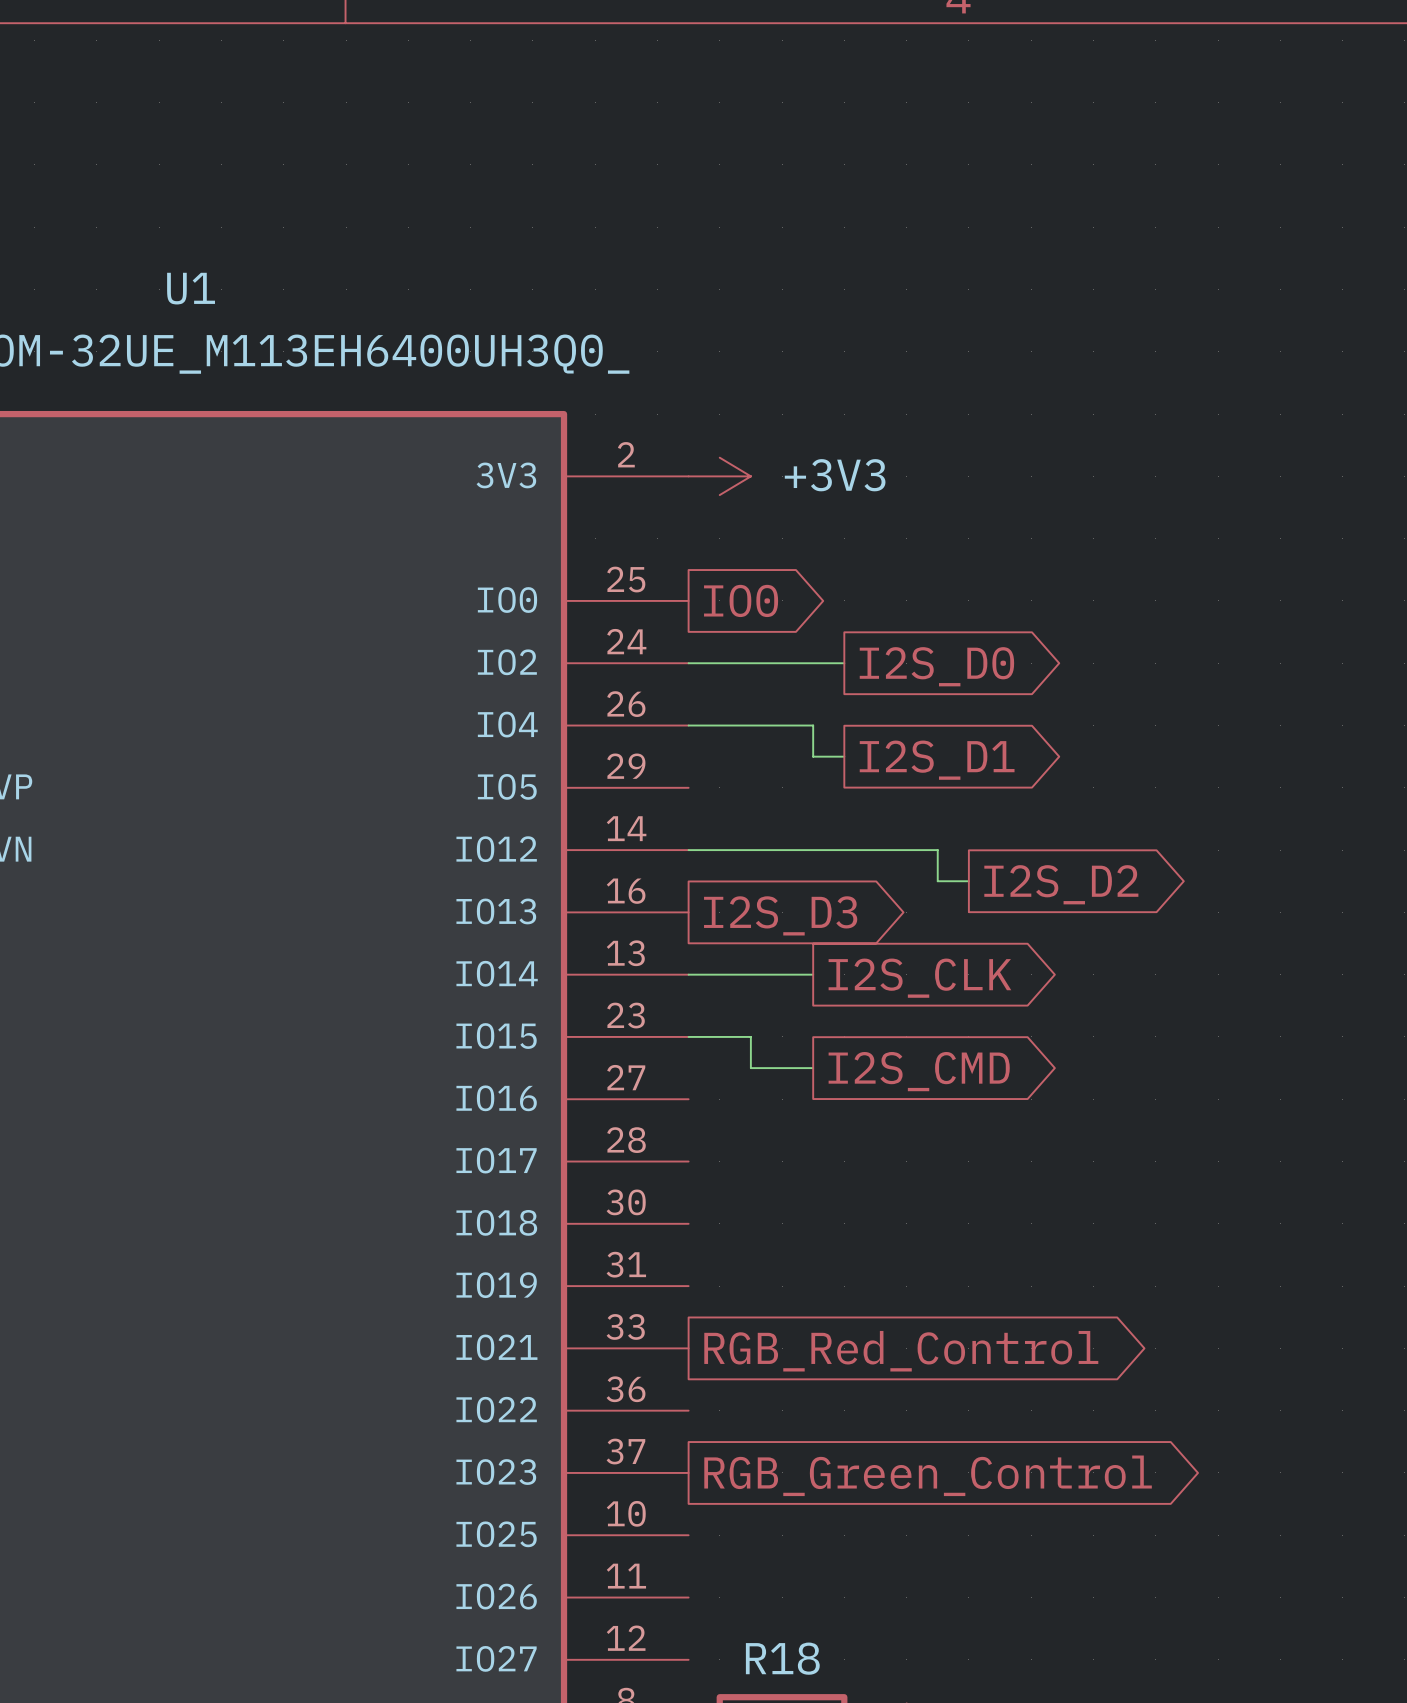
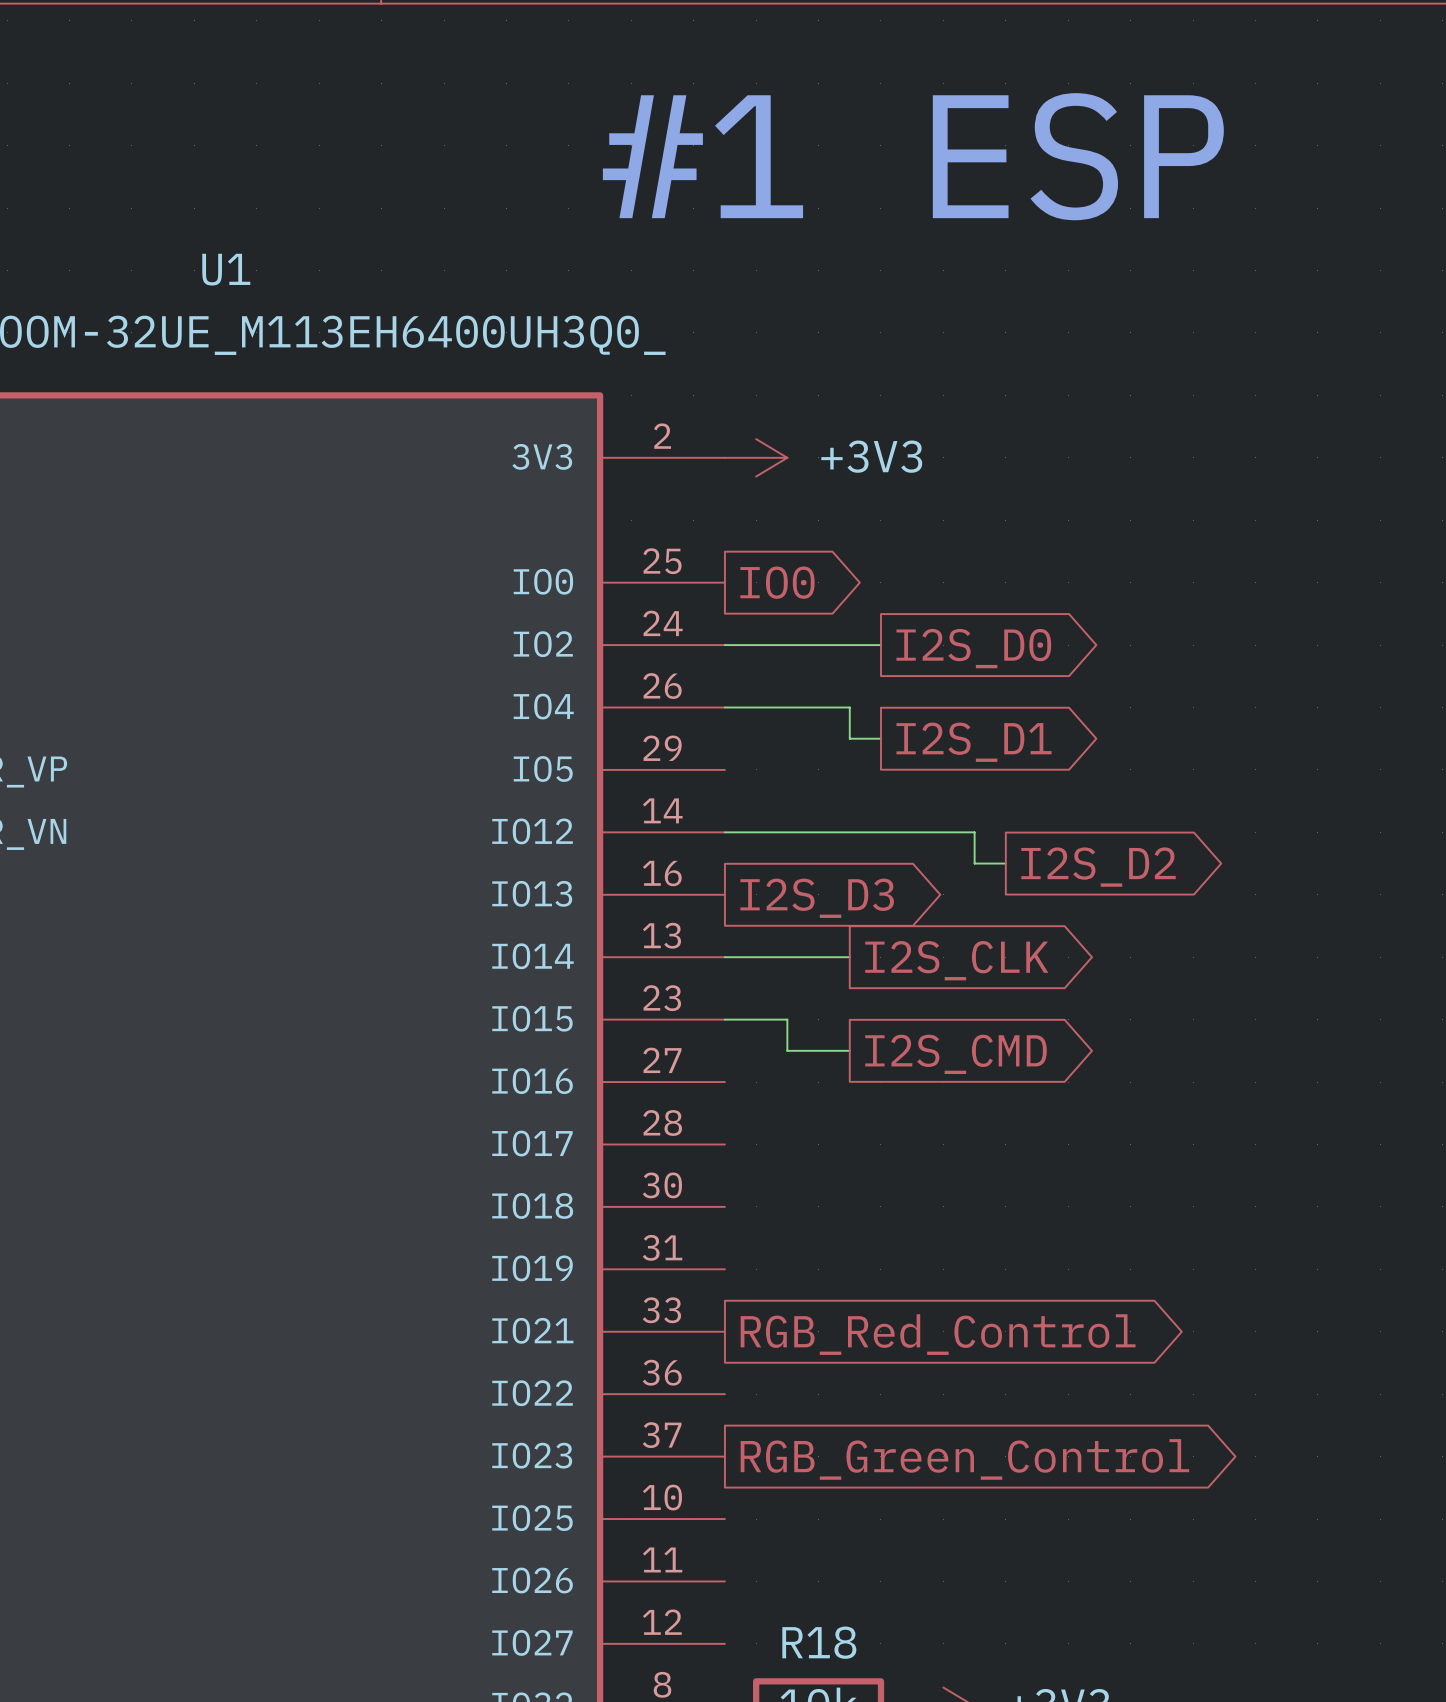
text: none -> #1 ESP (913, 156)

